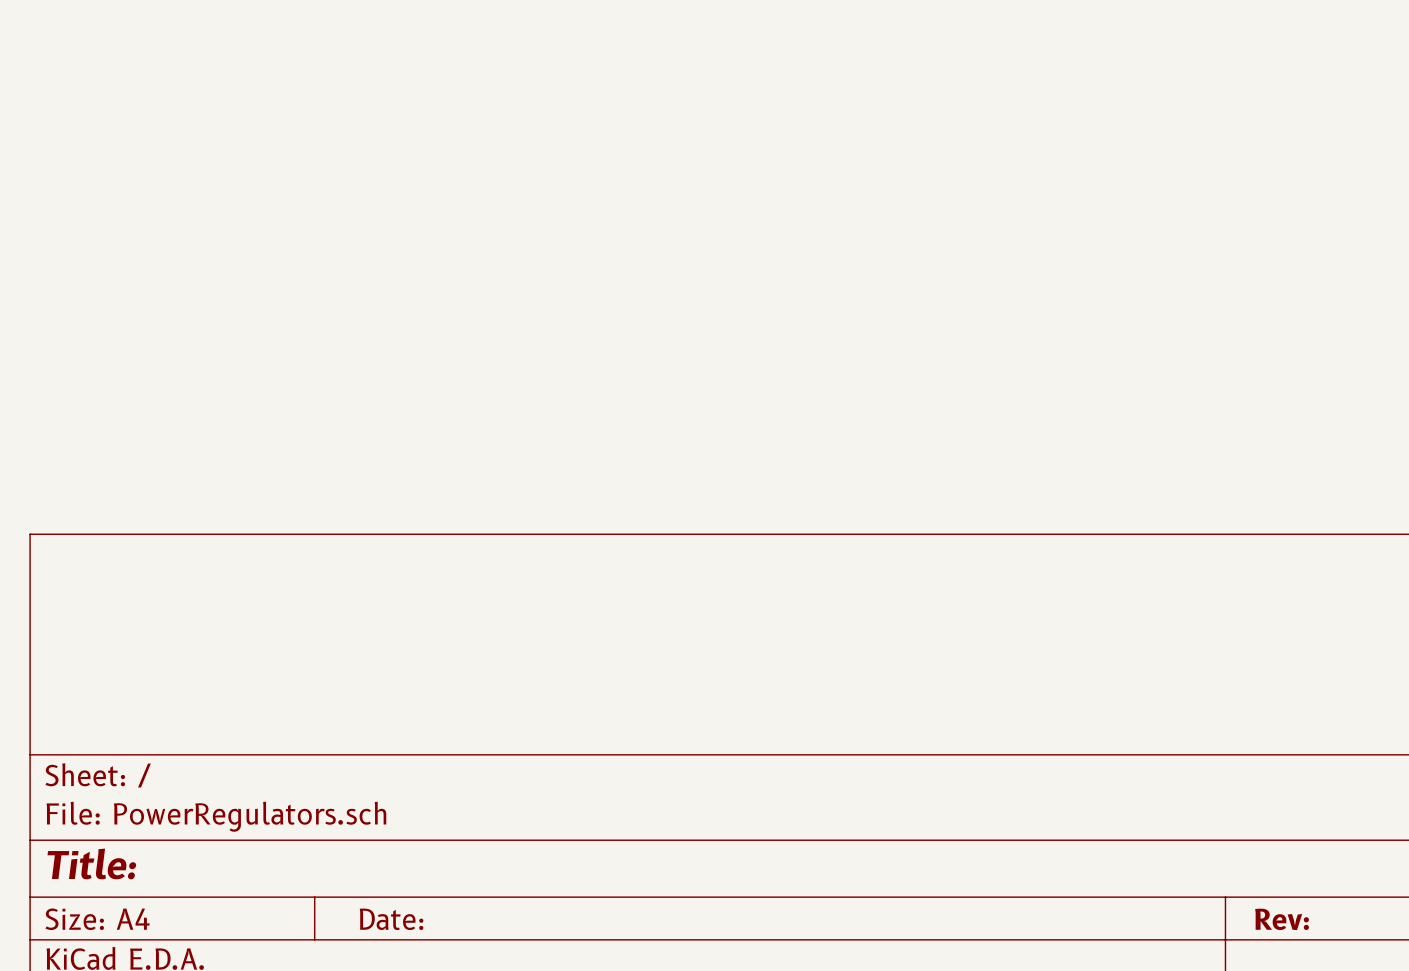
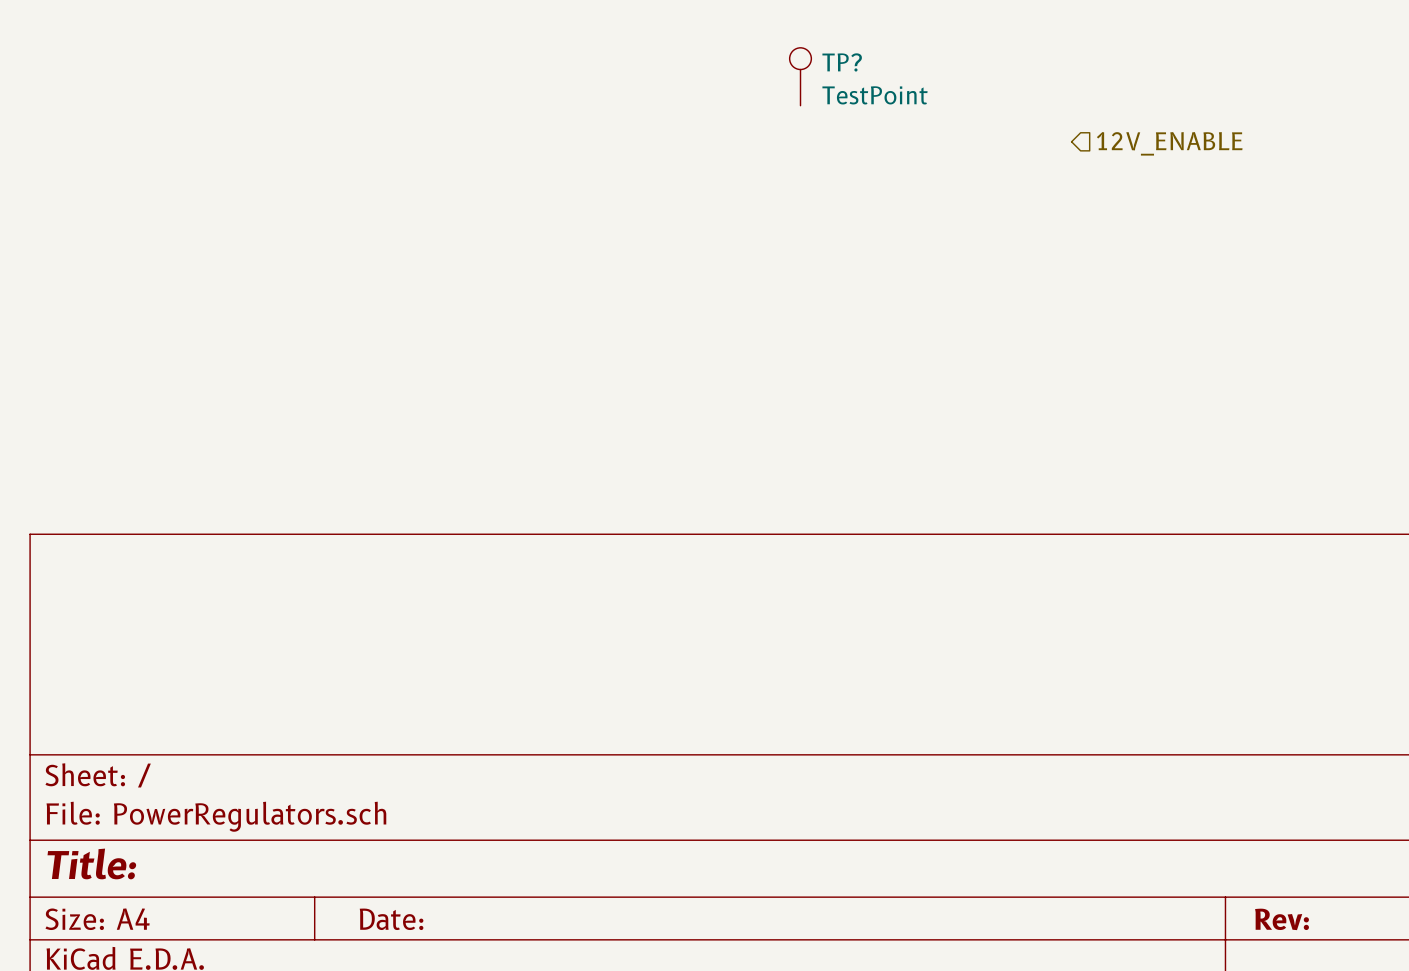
TP?: none -> TestPoint (800, 76)
hierarchical label: none -> 12V_ENABLE (1169, 143)

